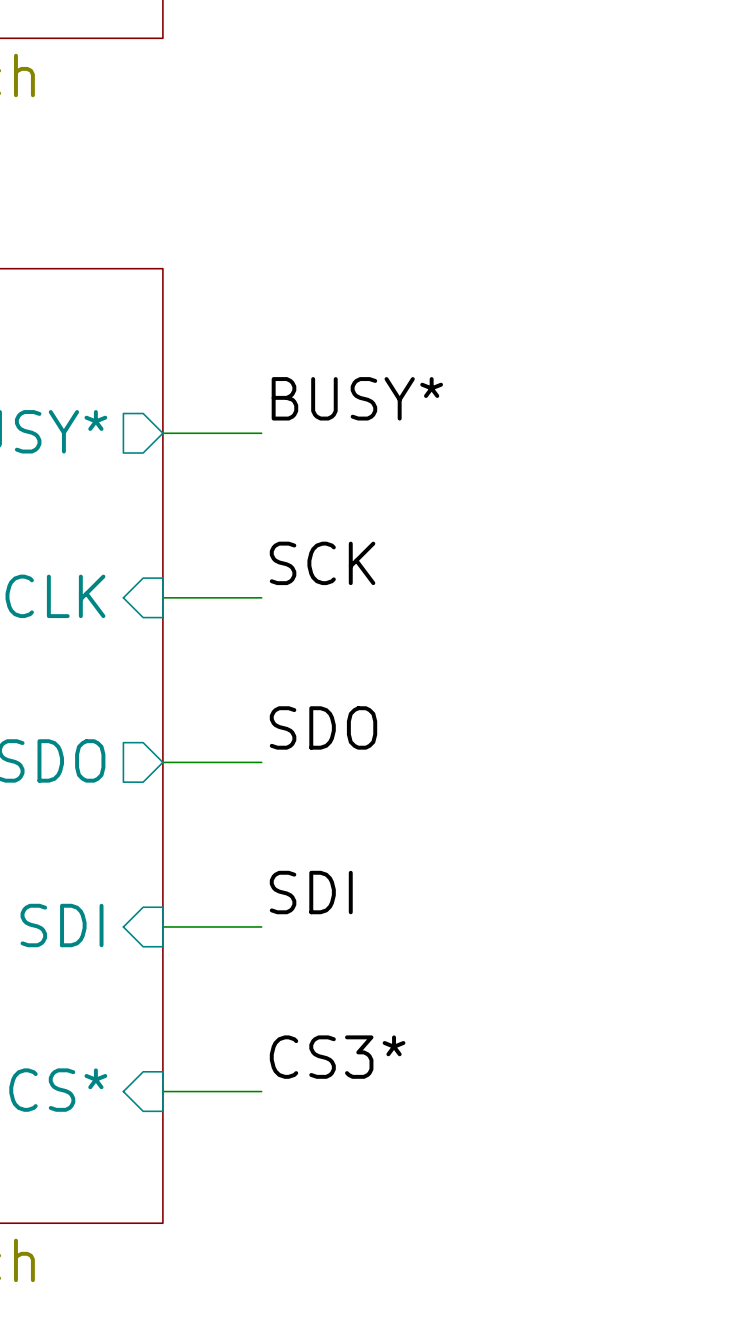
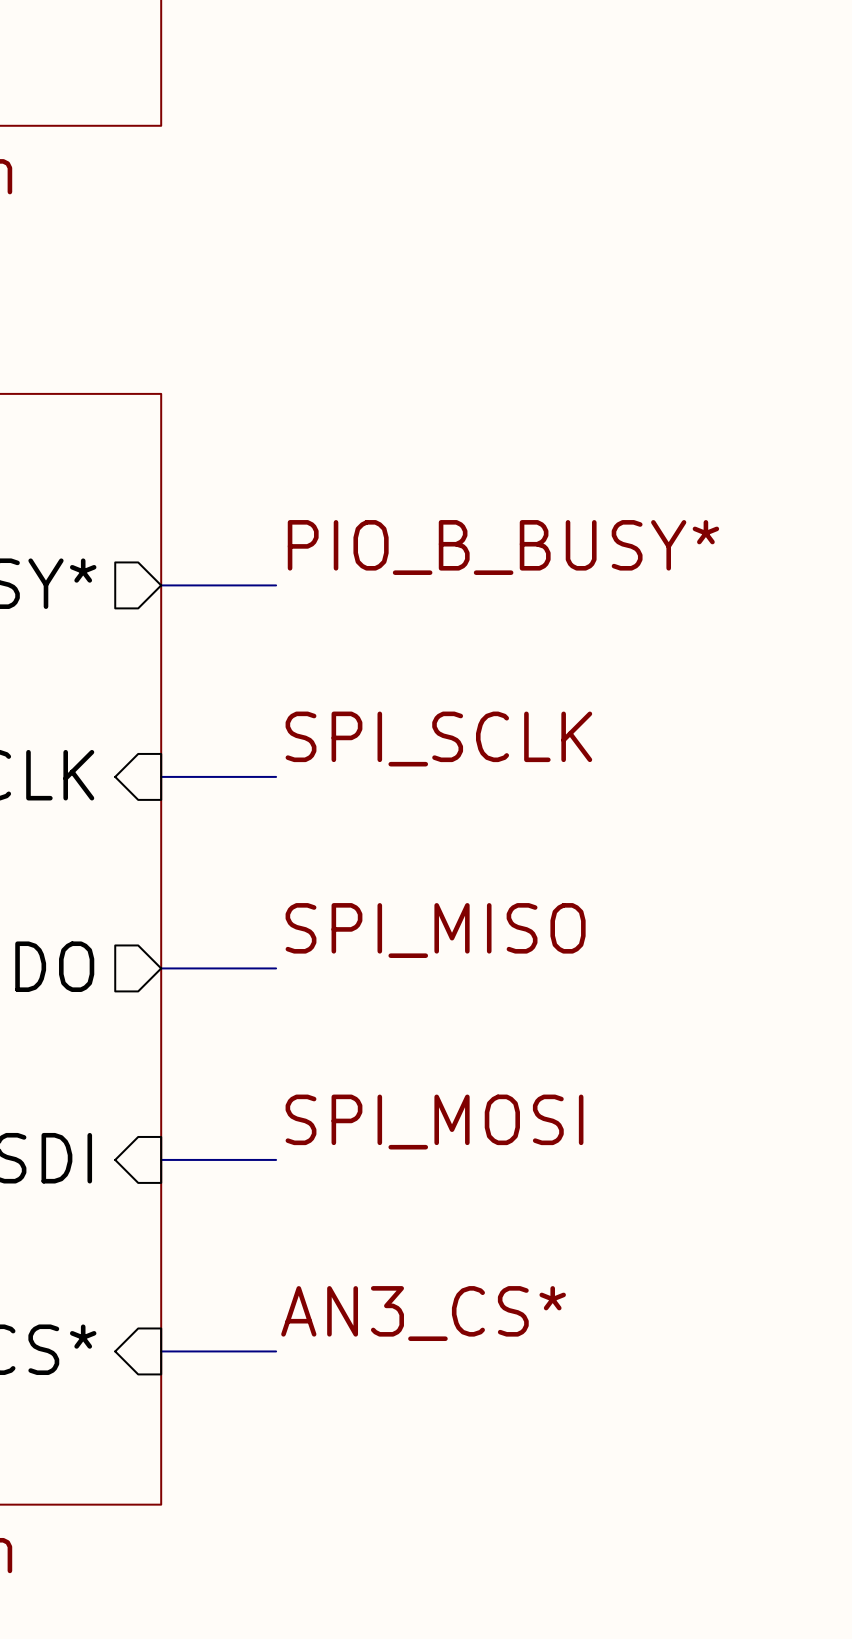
label: BUSY* (357, 398) -> PIO_B_BUSY* (503, 547)
label: SCK (322, 563) -> SPI_SCLK (438, 739)
label: SDO (323, 727) -> SPI_MISO (435, 930)
label: SDI (311, 892) -> SPI_MOSI (434, 1122)
label: CS3* (337, 1057) -> AN3_CS* (423, 1313)

